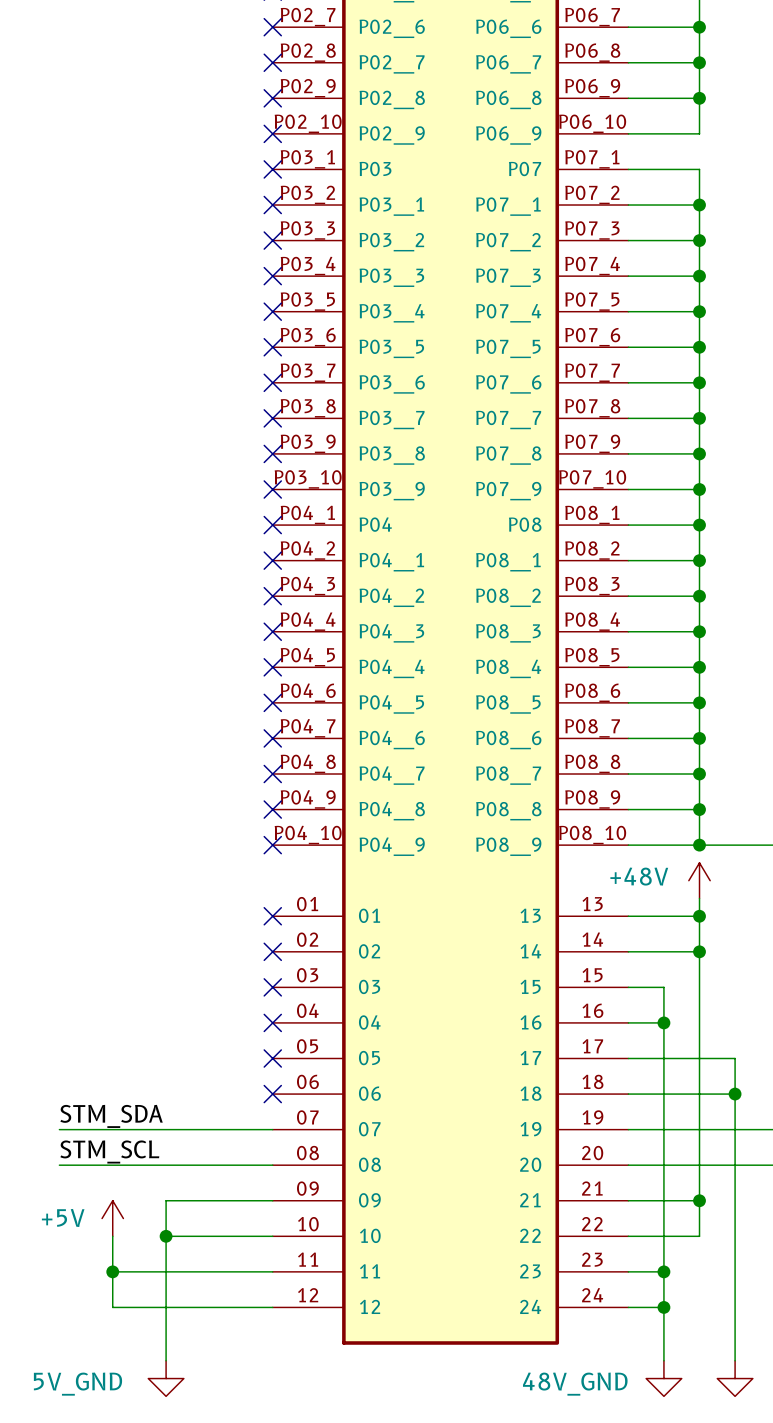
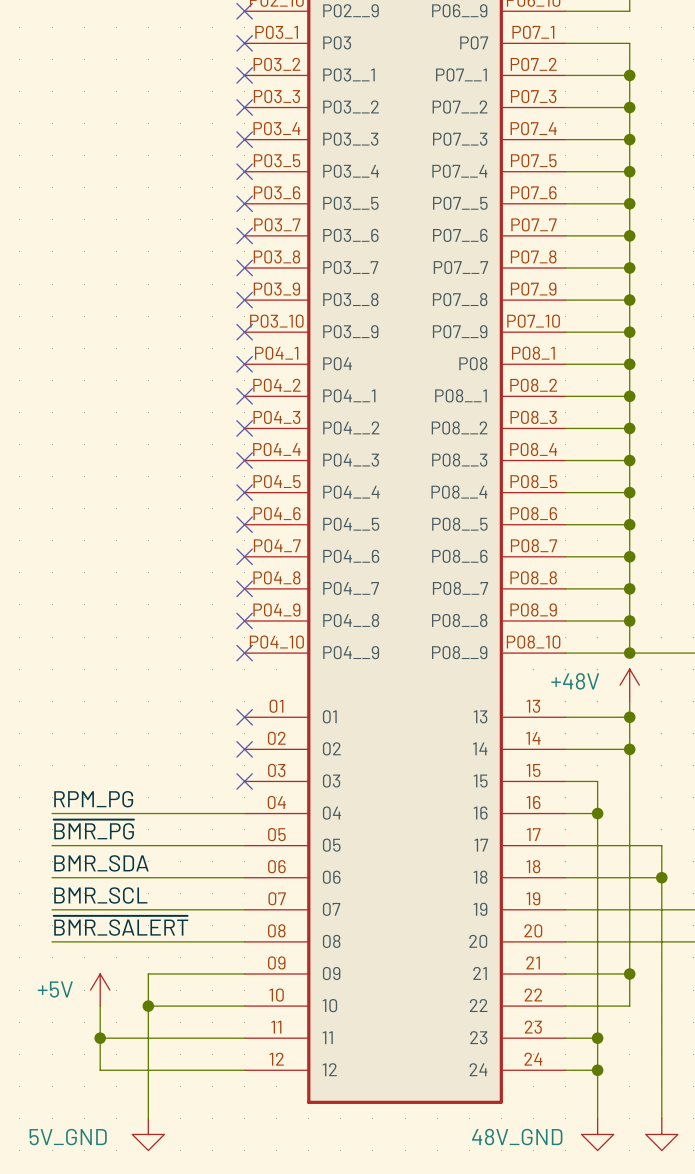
label: none -> RPM_PG (93, 799)
wire: none -> (52, 813) (244, 813)
no-connect mark: (272, 1022) -> none
label: none -> ~{BMR_PG} (93, 829)
wire: none -> (52, 845) (244, 845)
no-connect mark: (272, 1058) -> none
label: none -> BMR_SDA (101, 863)
wire: none -> (52, 877) (244, 877)
no-connect mark: (272, 1094) -> none
label: STM_SDA (111, 1116) -> BMR_SCL (100, 895)
label: STM_SCL (109, 1151) -> ~{BMR_SALERT} (120, 925)

